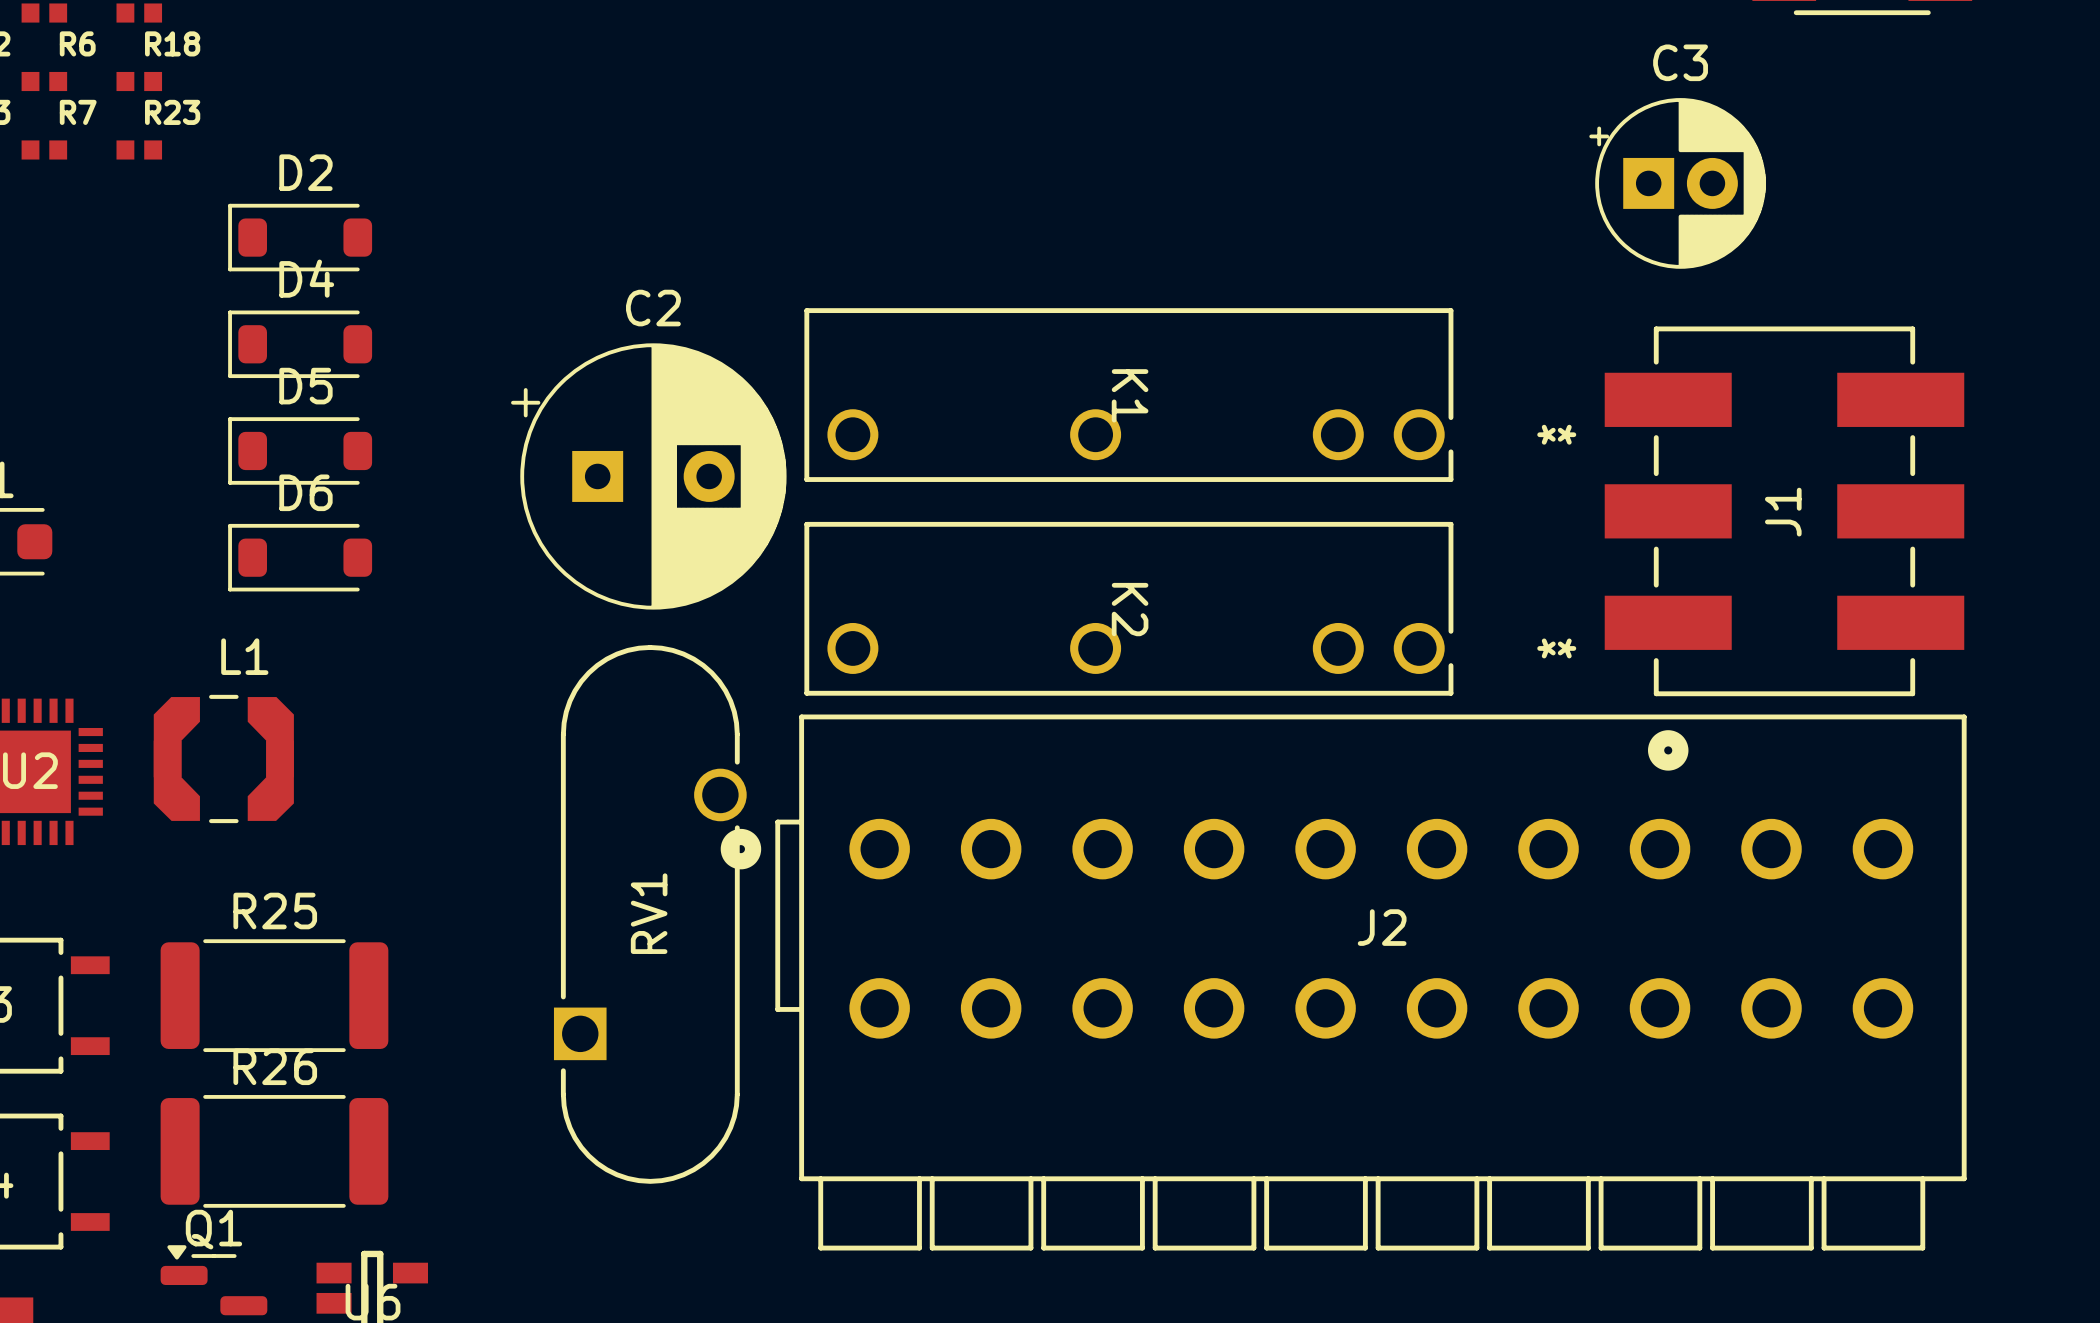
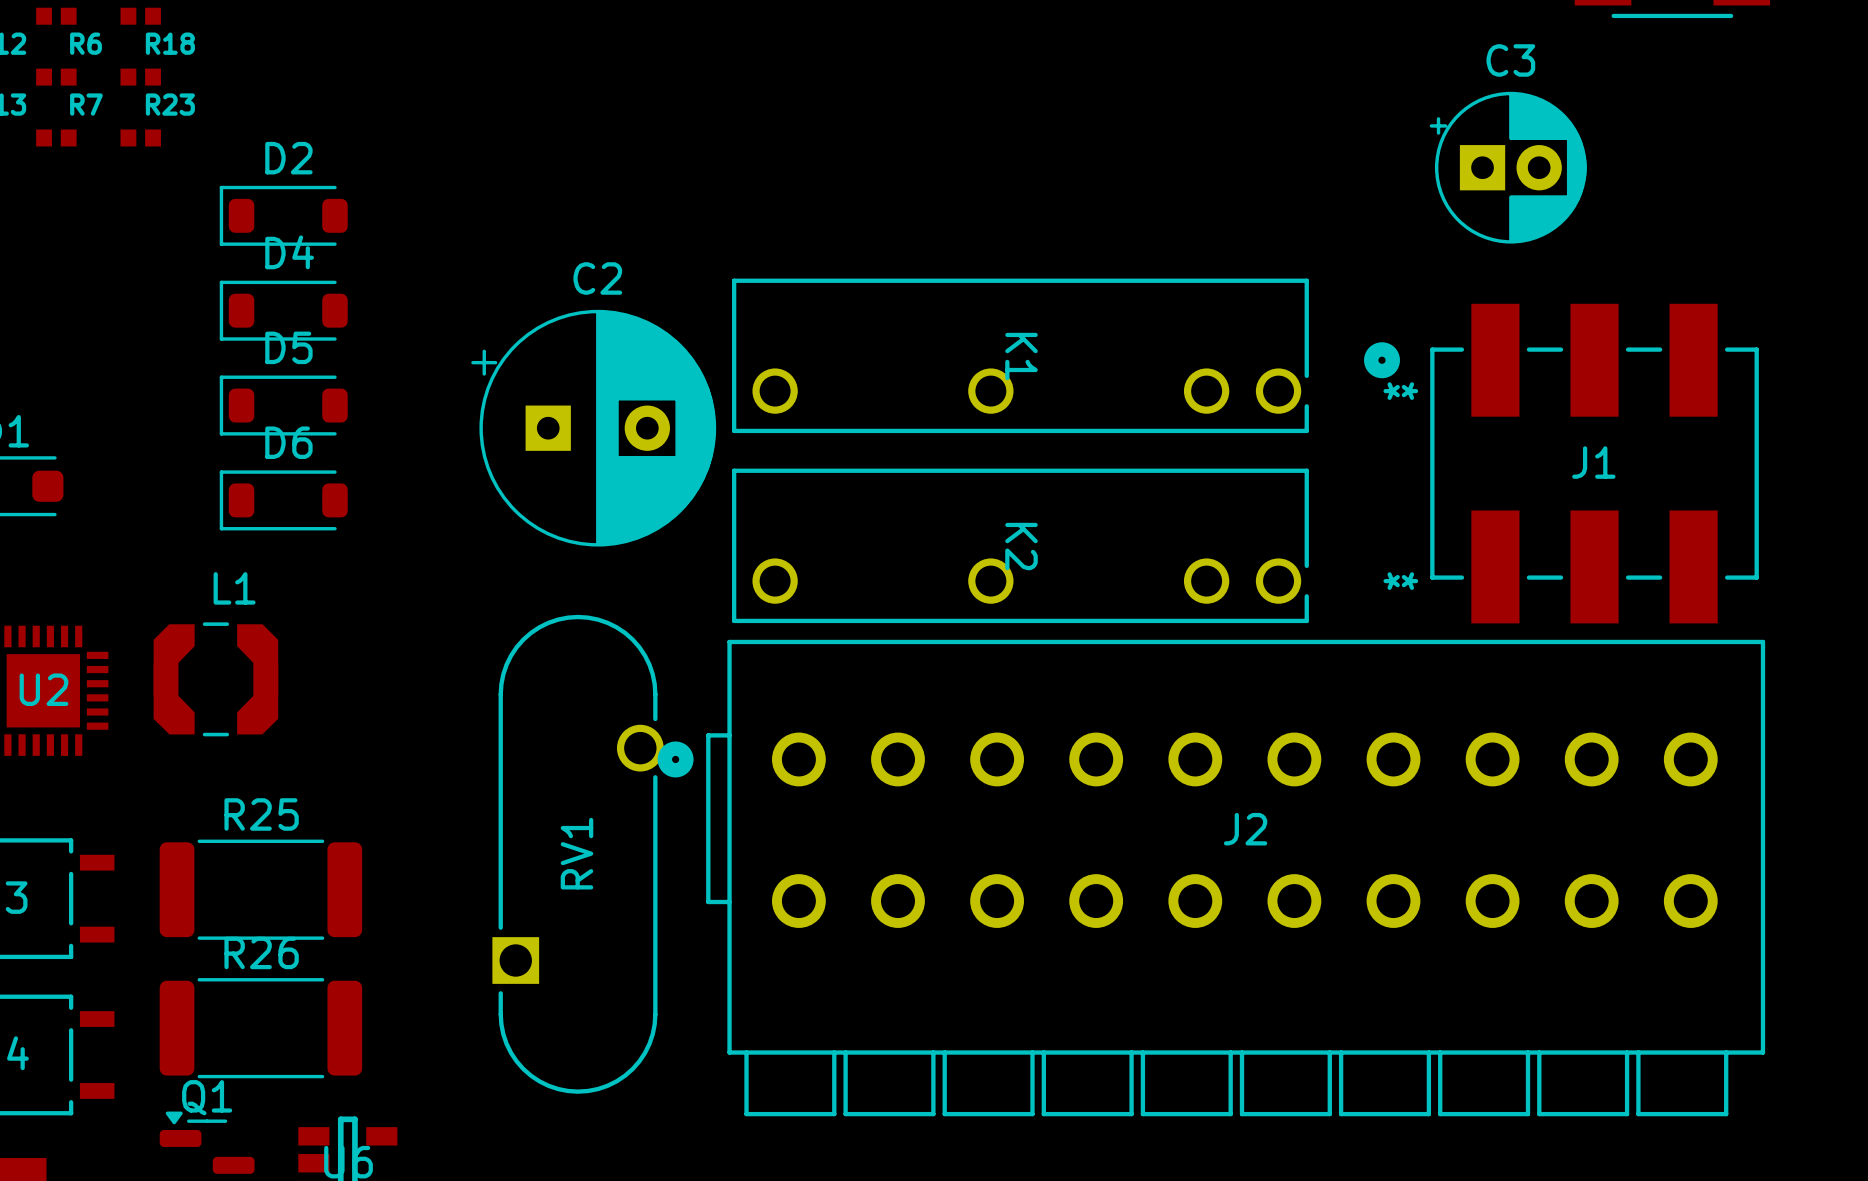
J1 rotation: 0° (1784, 548) -> 90° clockwise (1561, 463)
RV1 position: (650, 914) -> (578, 854)

